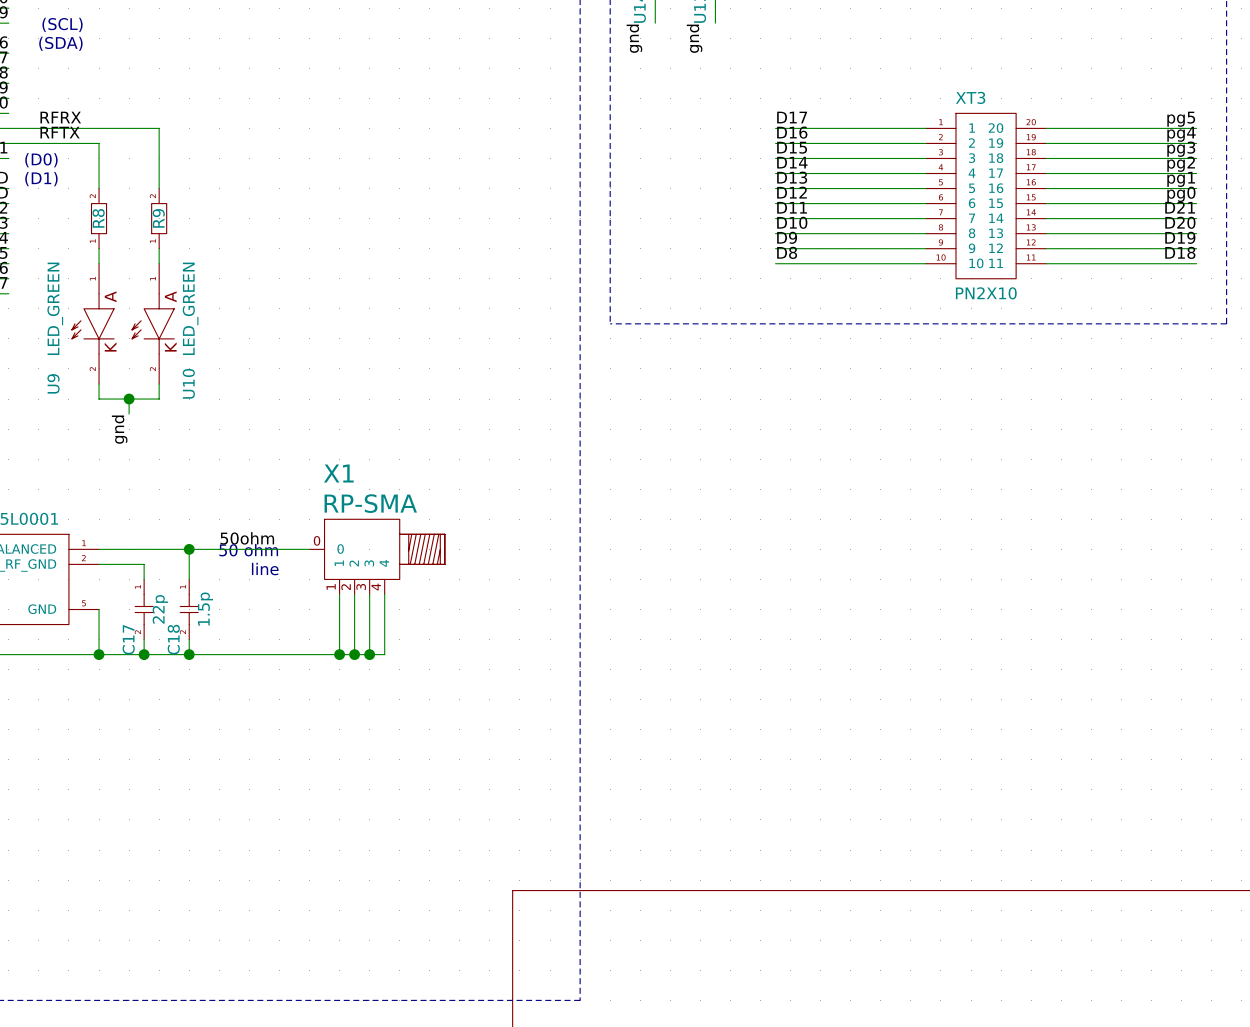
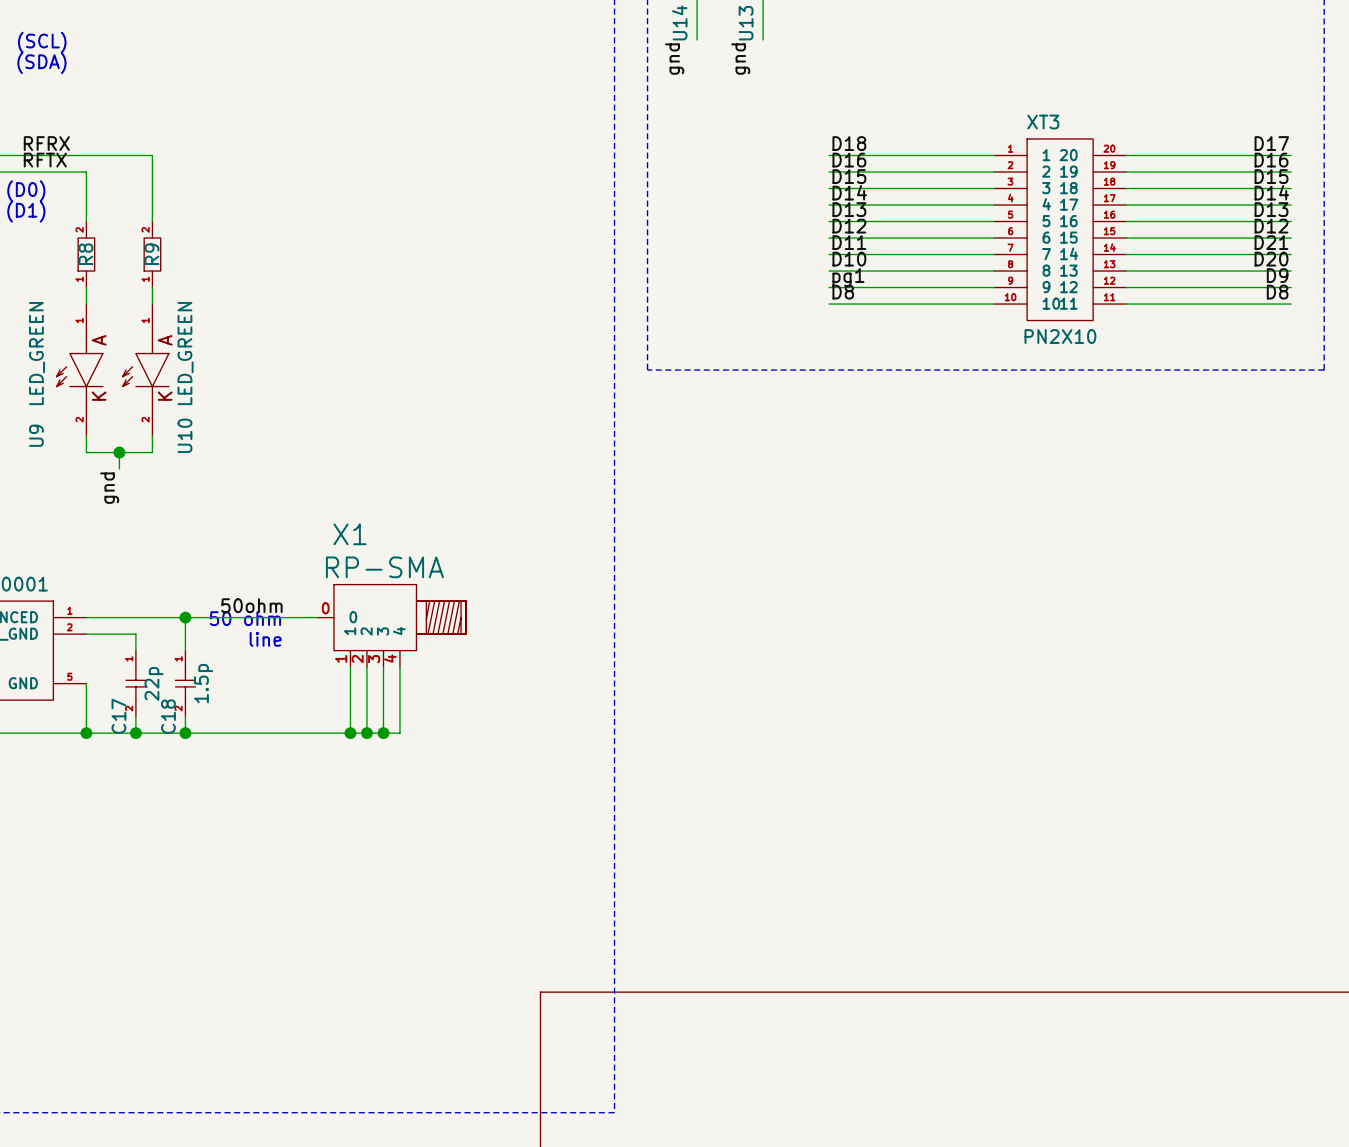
label: D17 (792, 117) -> D18 (849, 143)
label: pg5 (1181, 119) -> D17 (1271, 143)
label: pg4 (1181, 134) -> D16 (1271, 160)
label: pg3 (1181, 149) -> D15 (1271, 176)
label: pg2 (1181, 164) -> D14 (1271, 192)
label: pg1 (1181, 179) -> D13 (1271, 209)
label: pg0 (1181, 194) -> D12 (1271, 226)
label: D9 (787, 237) -> pg1 (848, 277)
label: D19 (1180, 237) -> D9 (1277, 275)
label: D18 (1180, 252) -> D8 (1277, 292)

